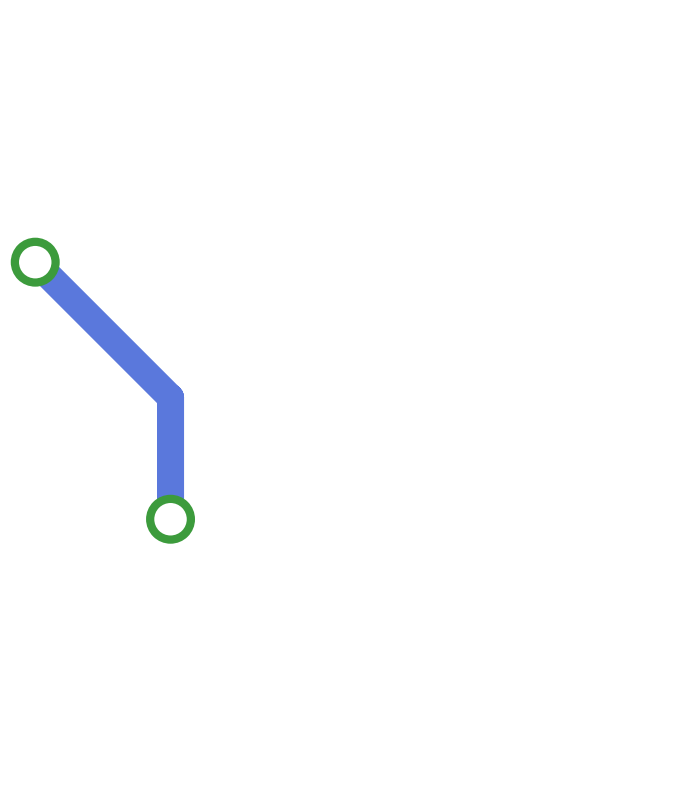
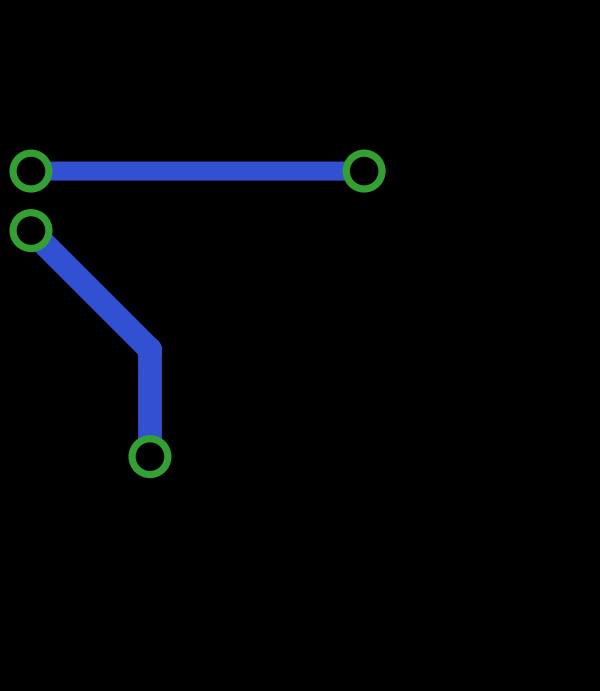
via: none -> (30, 171)
track: none -> (364, 171) (30, 171)
via: none -> (364, 171)

